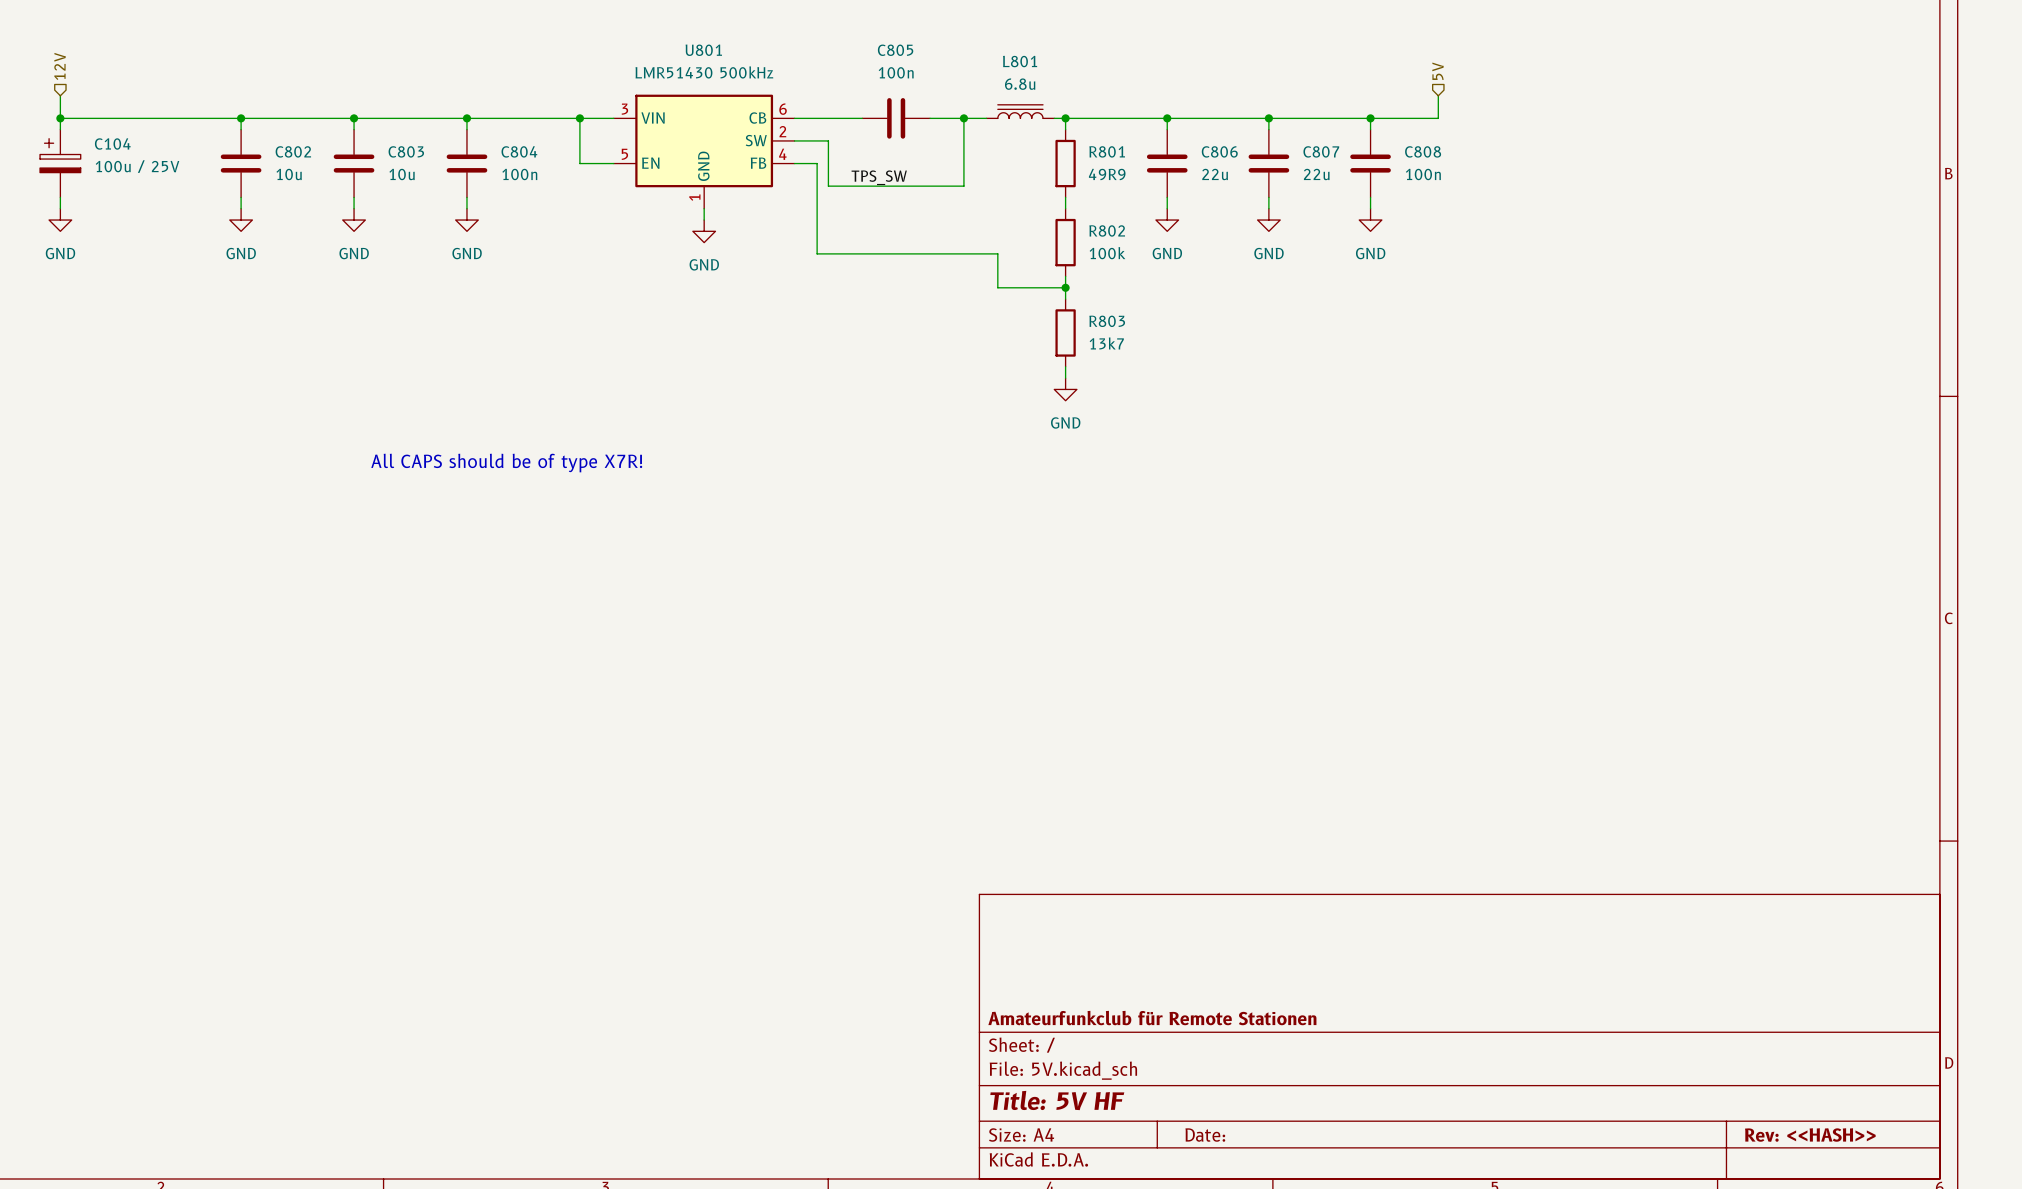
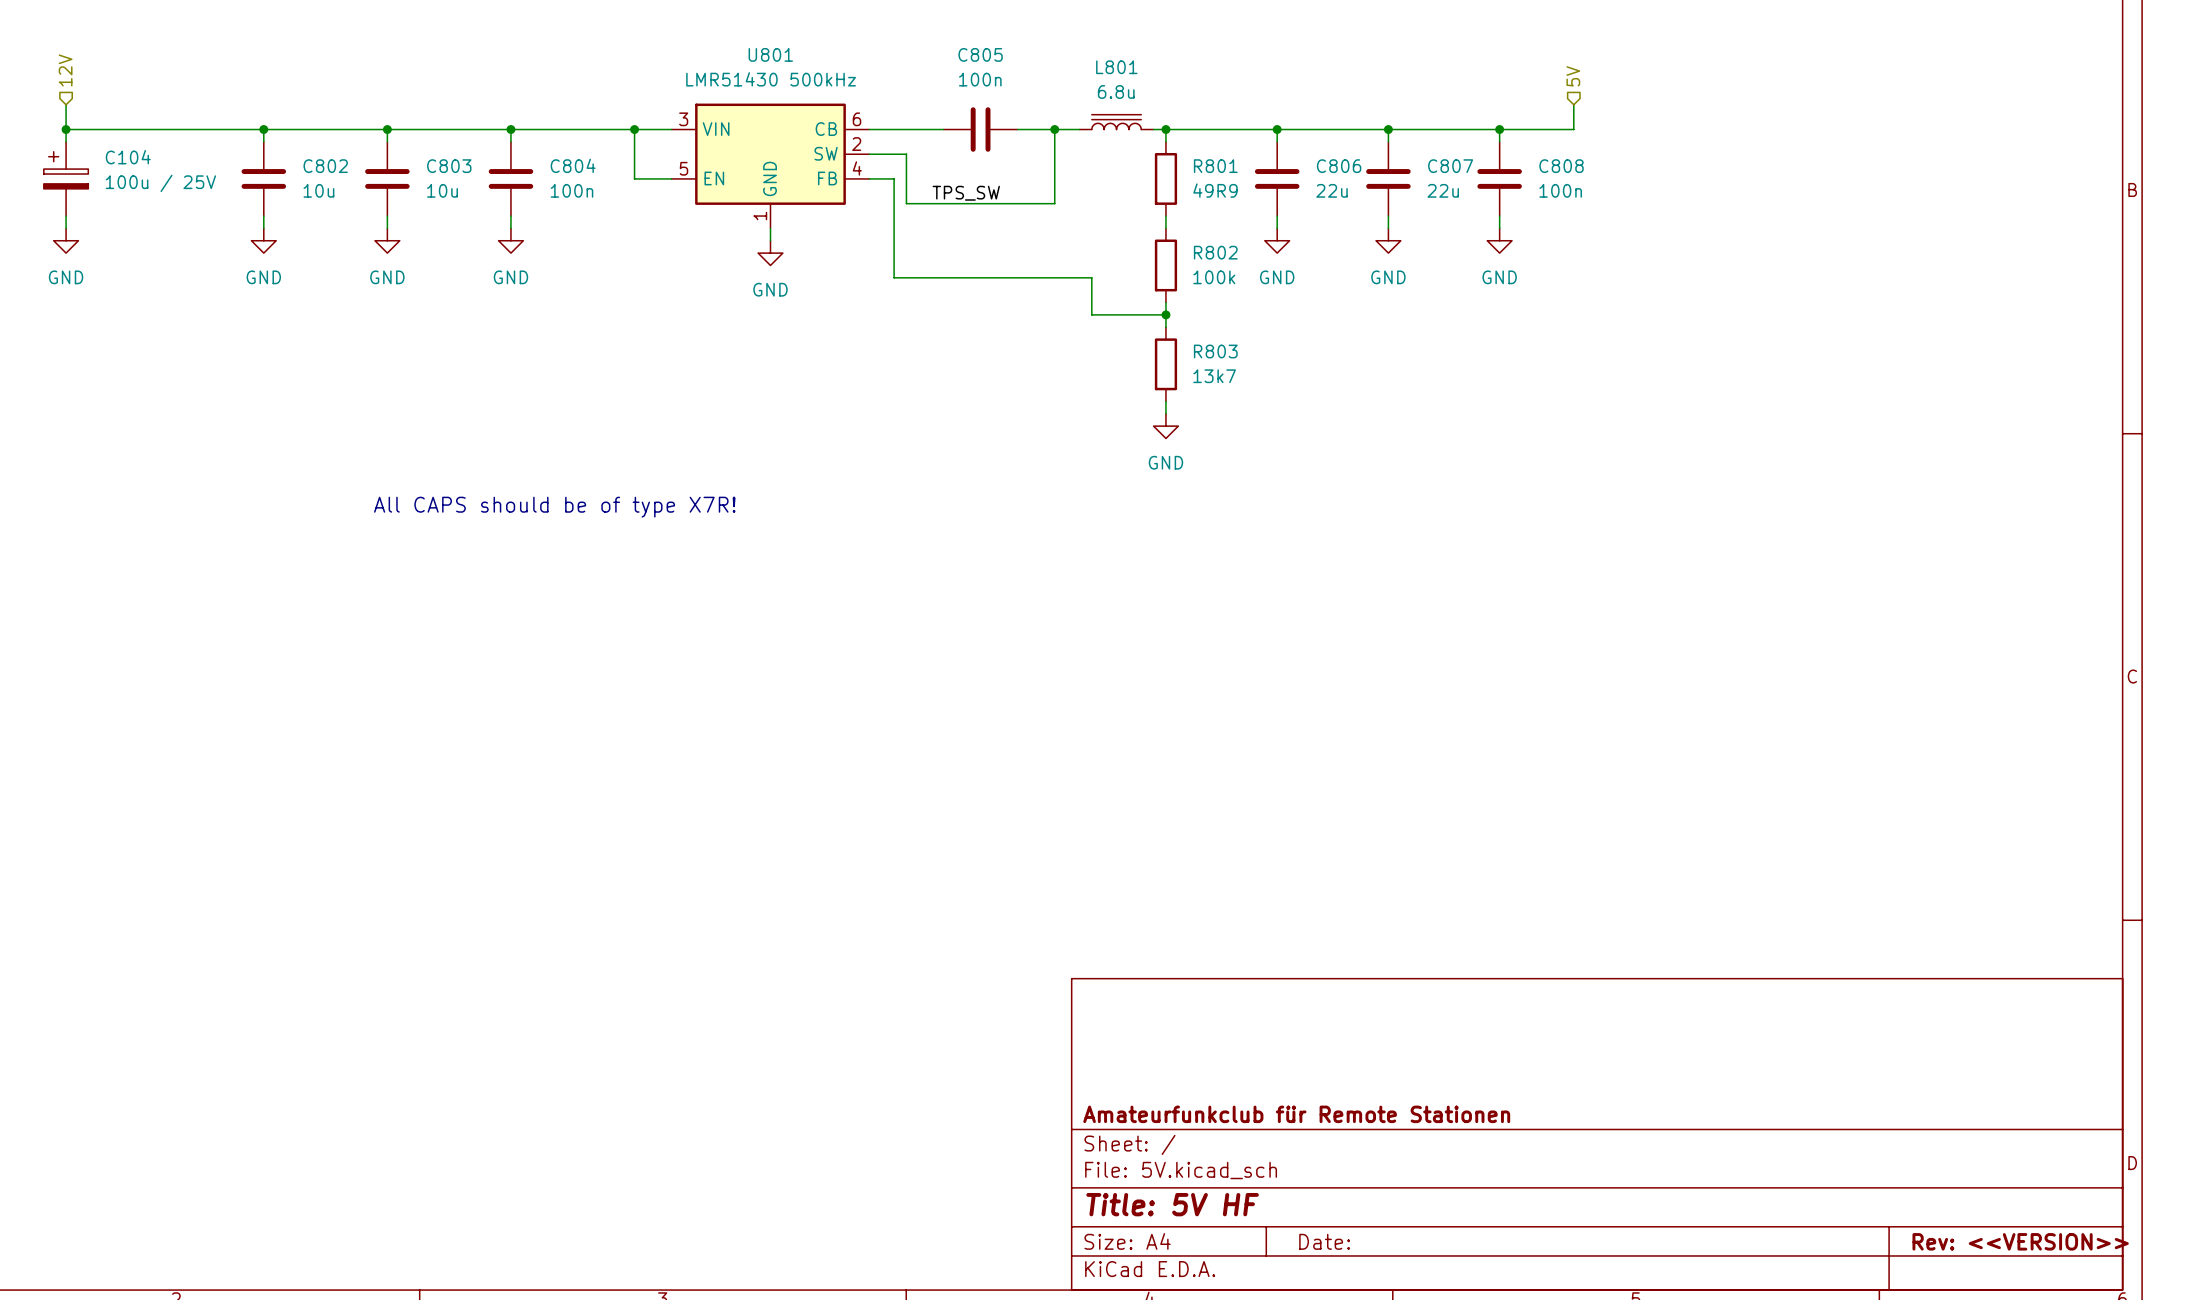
title block: Rev: <<HASH>> (1810, 1135) -> Rev: <<VERSION>> (2020, 1241)

